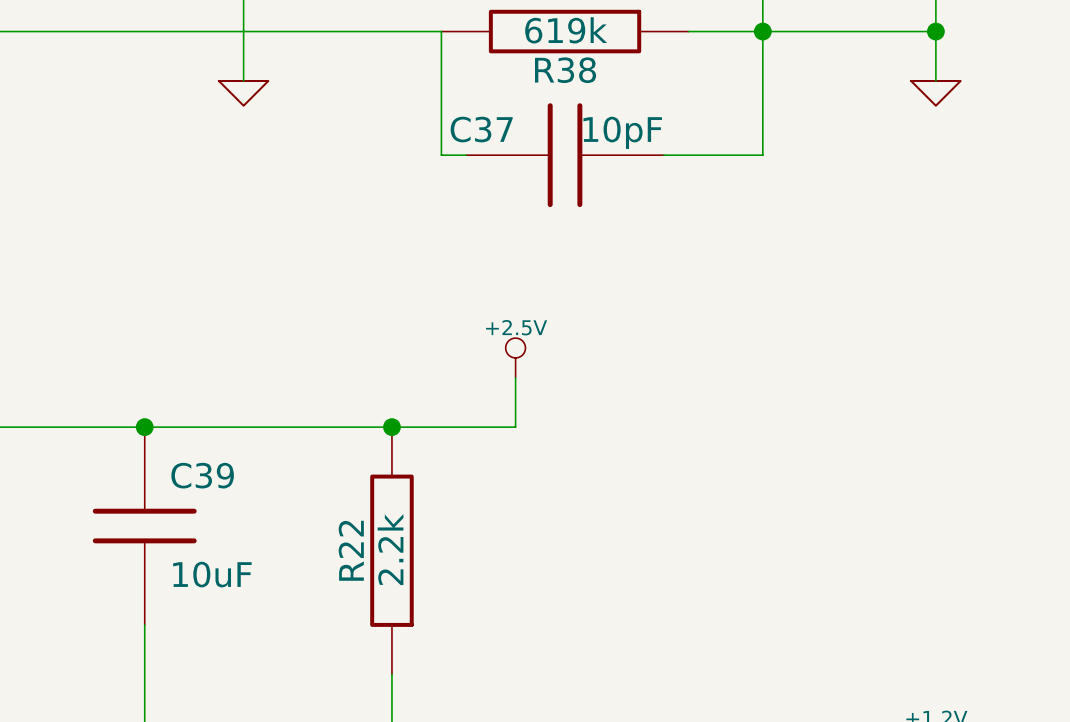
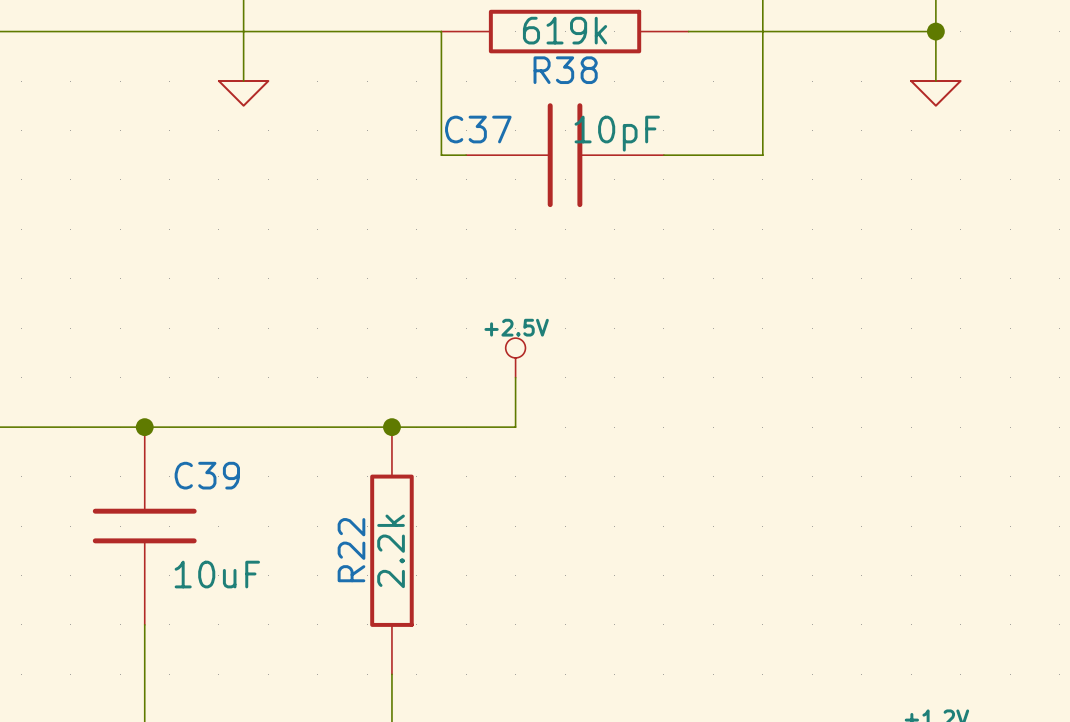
junction: (762, 31) -> none

